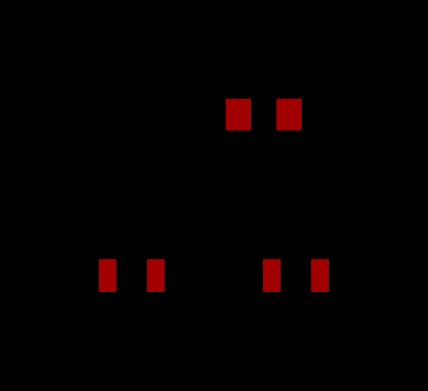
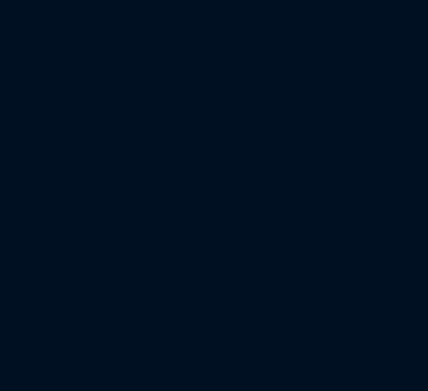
part: (263, 114) -> none
part: (131, 275) -> none
part: (295, 275) -> none

